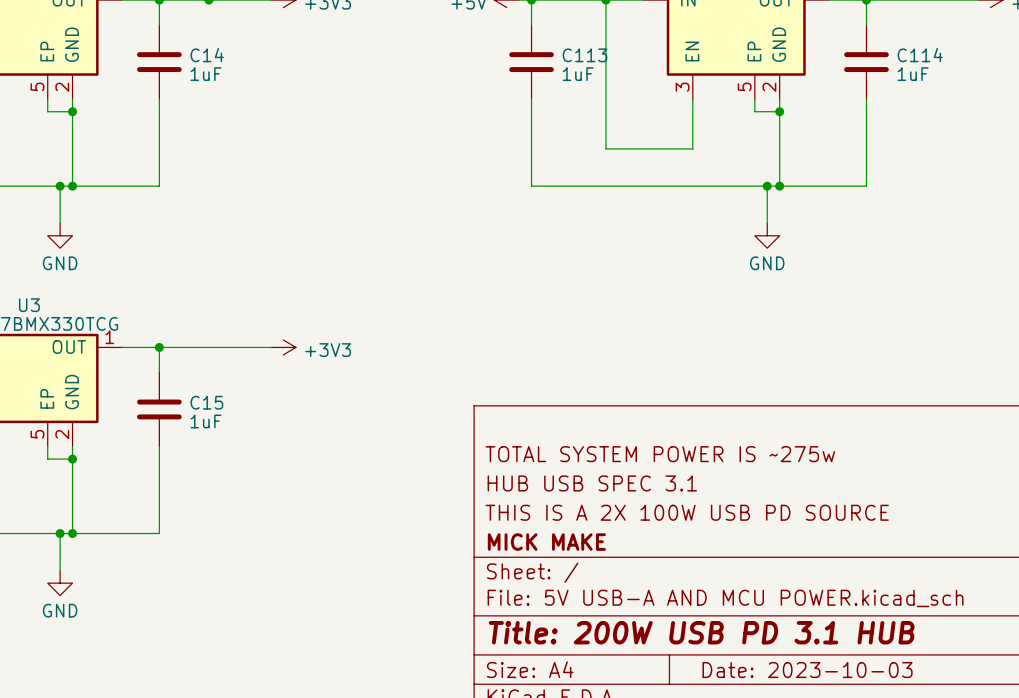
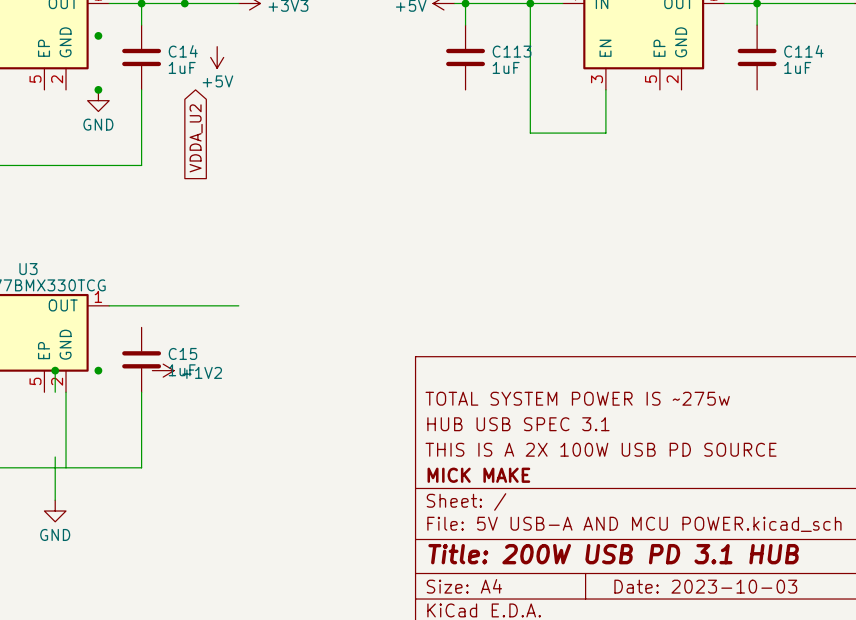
junction: none -> (98, 35)
power symbol: none -> +5V (217, 57)
wire: (47, 99) (47, 111) (72, 111) -> none
wire: (72, 99) (72, 186) -> none
wire: (531, 99) (531, 186) (866, 186) (866, 99) -> none
wire: (754, 99) (754, 111) (779, 111) -> none
wire: (779, 99) (779, 186) -> none
junction position: (72, 111) -> (98, 89)
junction: (779, 111) -> none
global label: none -> VDDA_U2 (196, 138)
wire: (60, 186) (60, 223) -> none
junction: (60, 186) -> none
junction: (72, 186) -> none
wire: (767, 186) (767, 223) -> none
junction: (767, 186) -> none
junction: (779, 186) -> none
power symbol position: GND (60, 235) -> GND (98, 100)
power symbol: GND (767, 235) -> none
wire: (159, 347) (159, 372) -> (55, 370) (55, 392)
junction: (159, 347) -> none
power symbol: +3V3 (283, 347) -> none
junction: none -> (55, 370)
junction: none -> (98, 370)
power symbol: none -> +1V2 (163, 370)
wire: (47, 446) (47, 459) (72, 459) -> none
junction: (72, 459) -> none
wire: none -> (55, 457) (55, 467)
junction: (60, 533) -> none
junction: (72, 533) -> none

